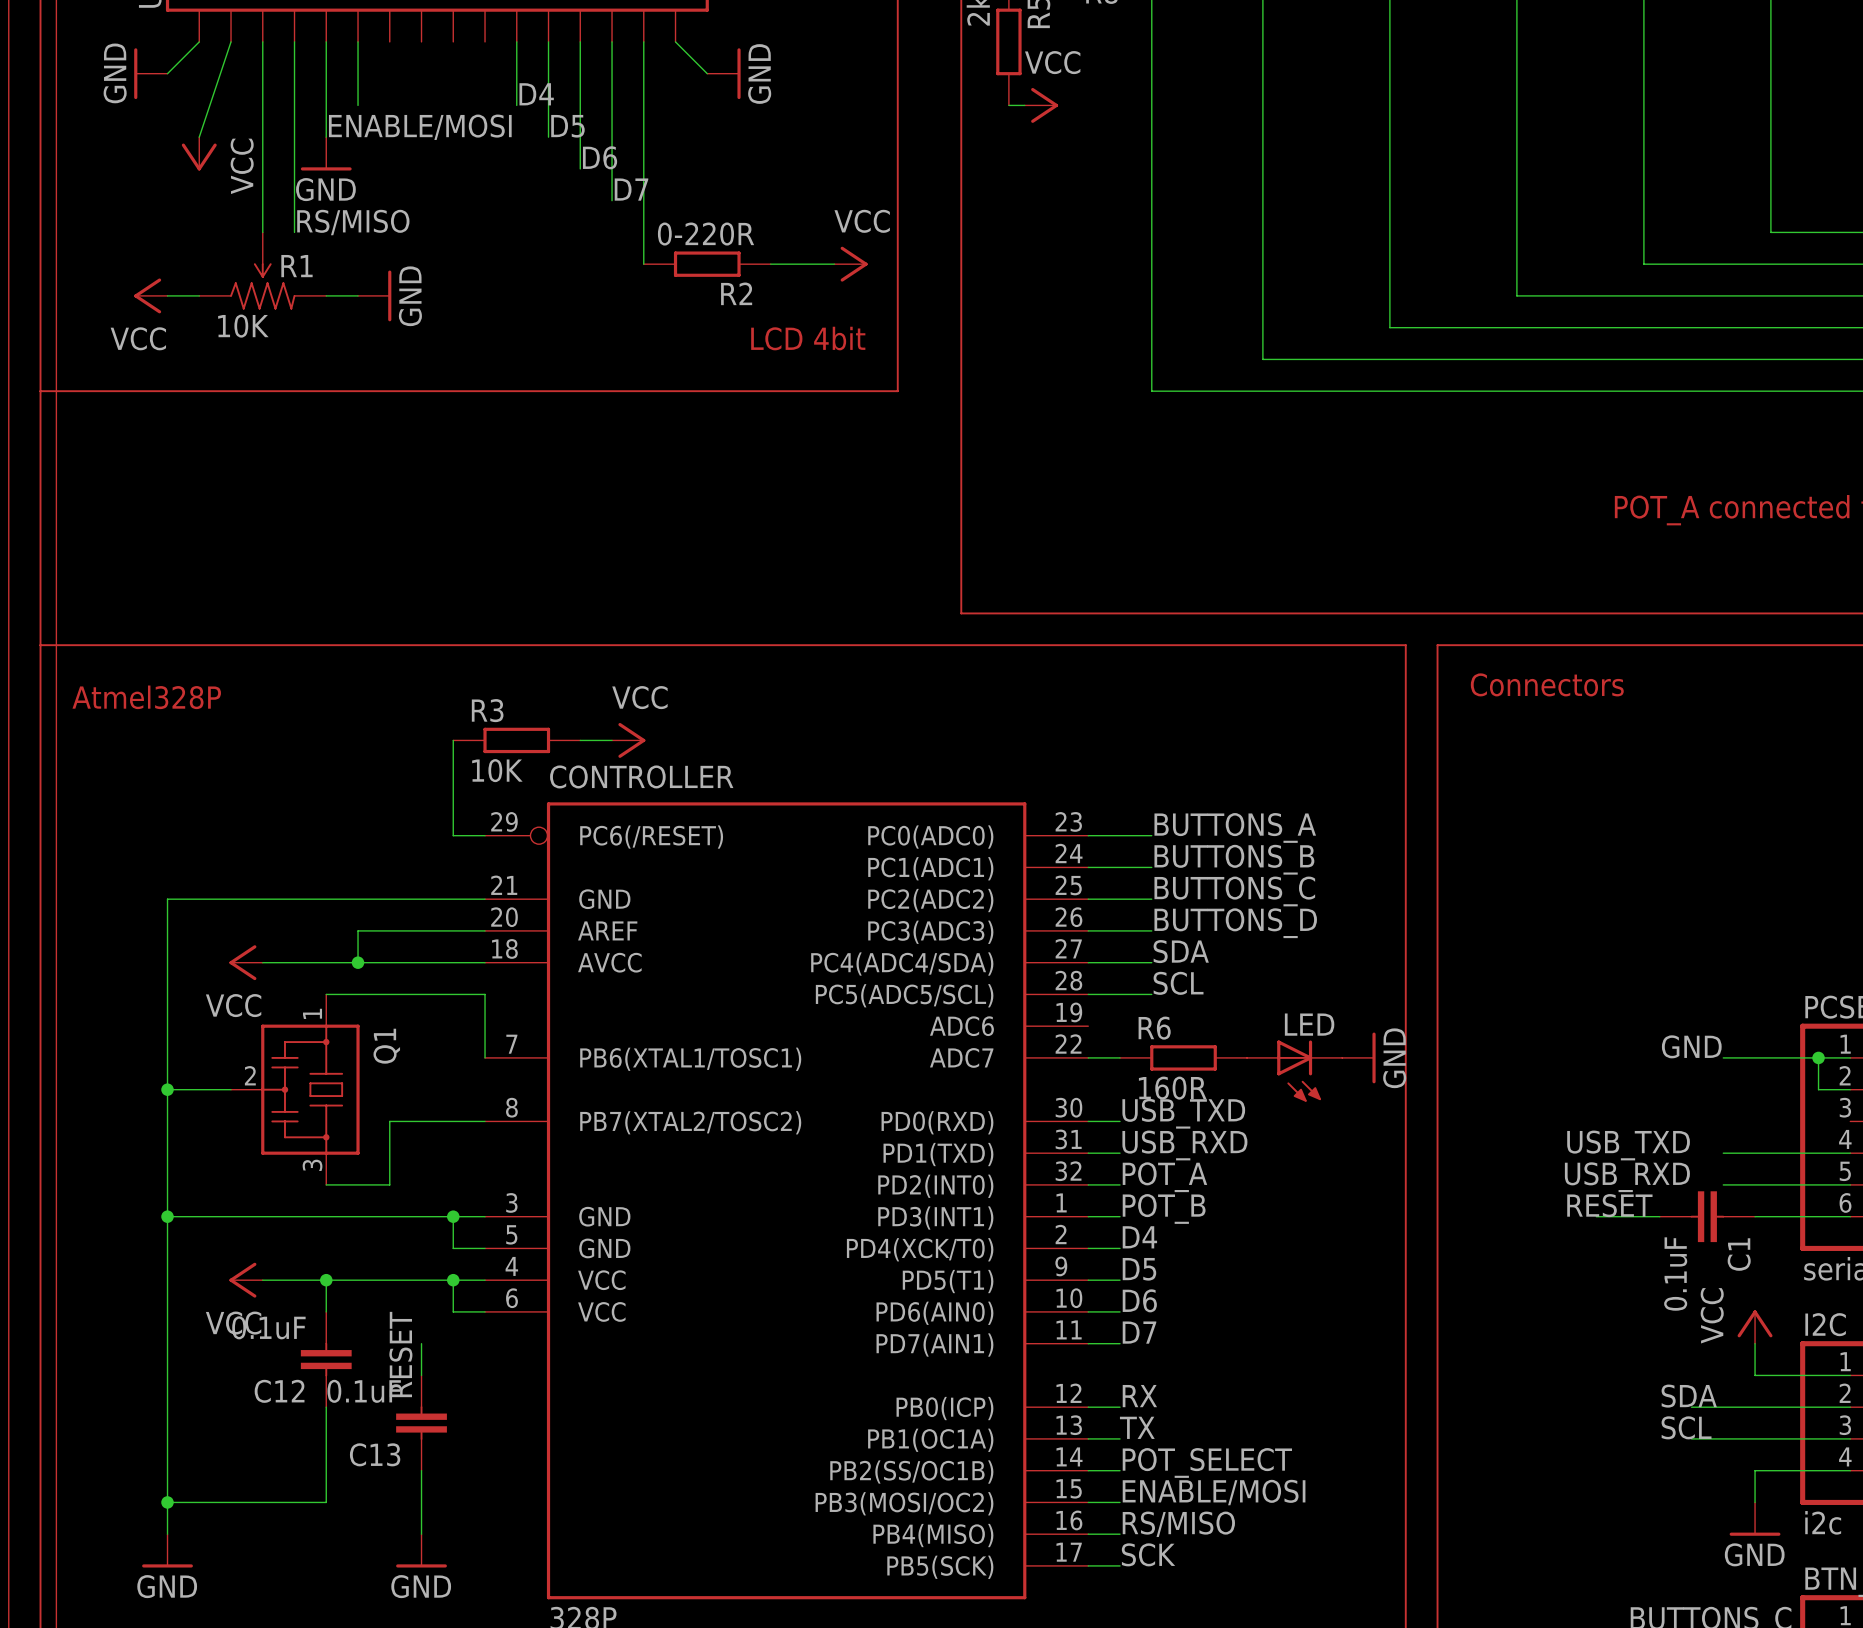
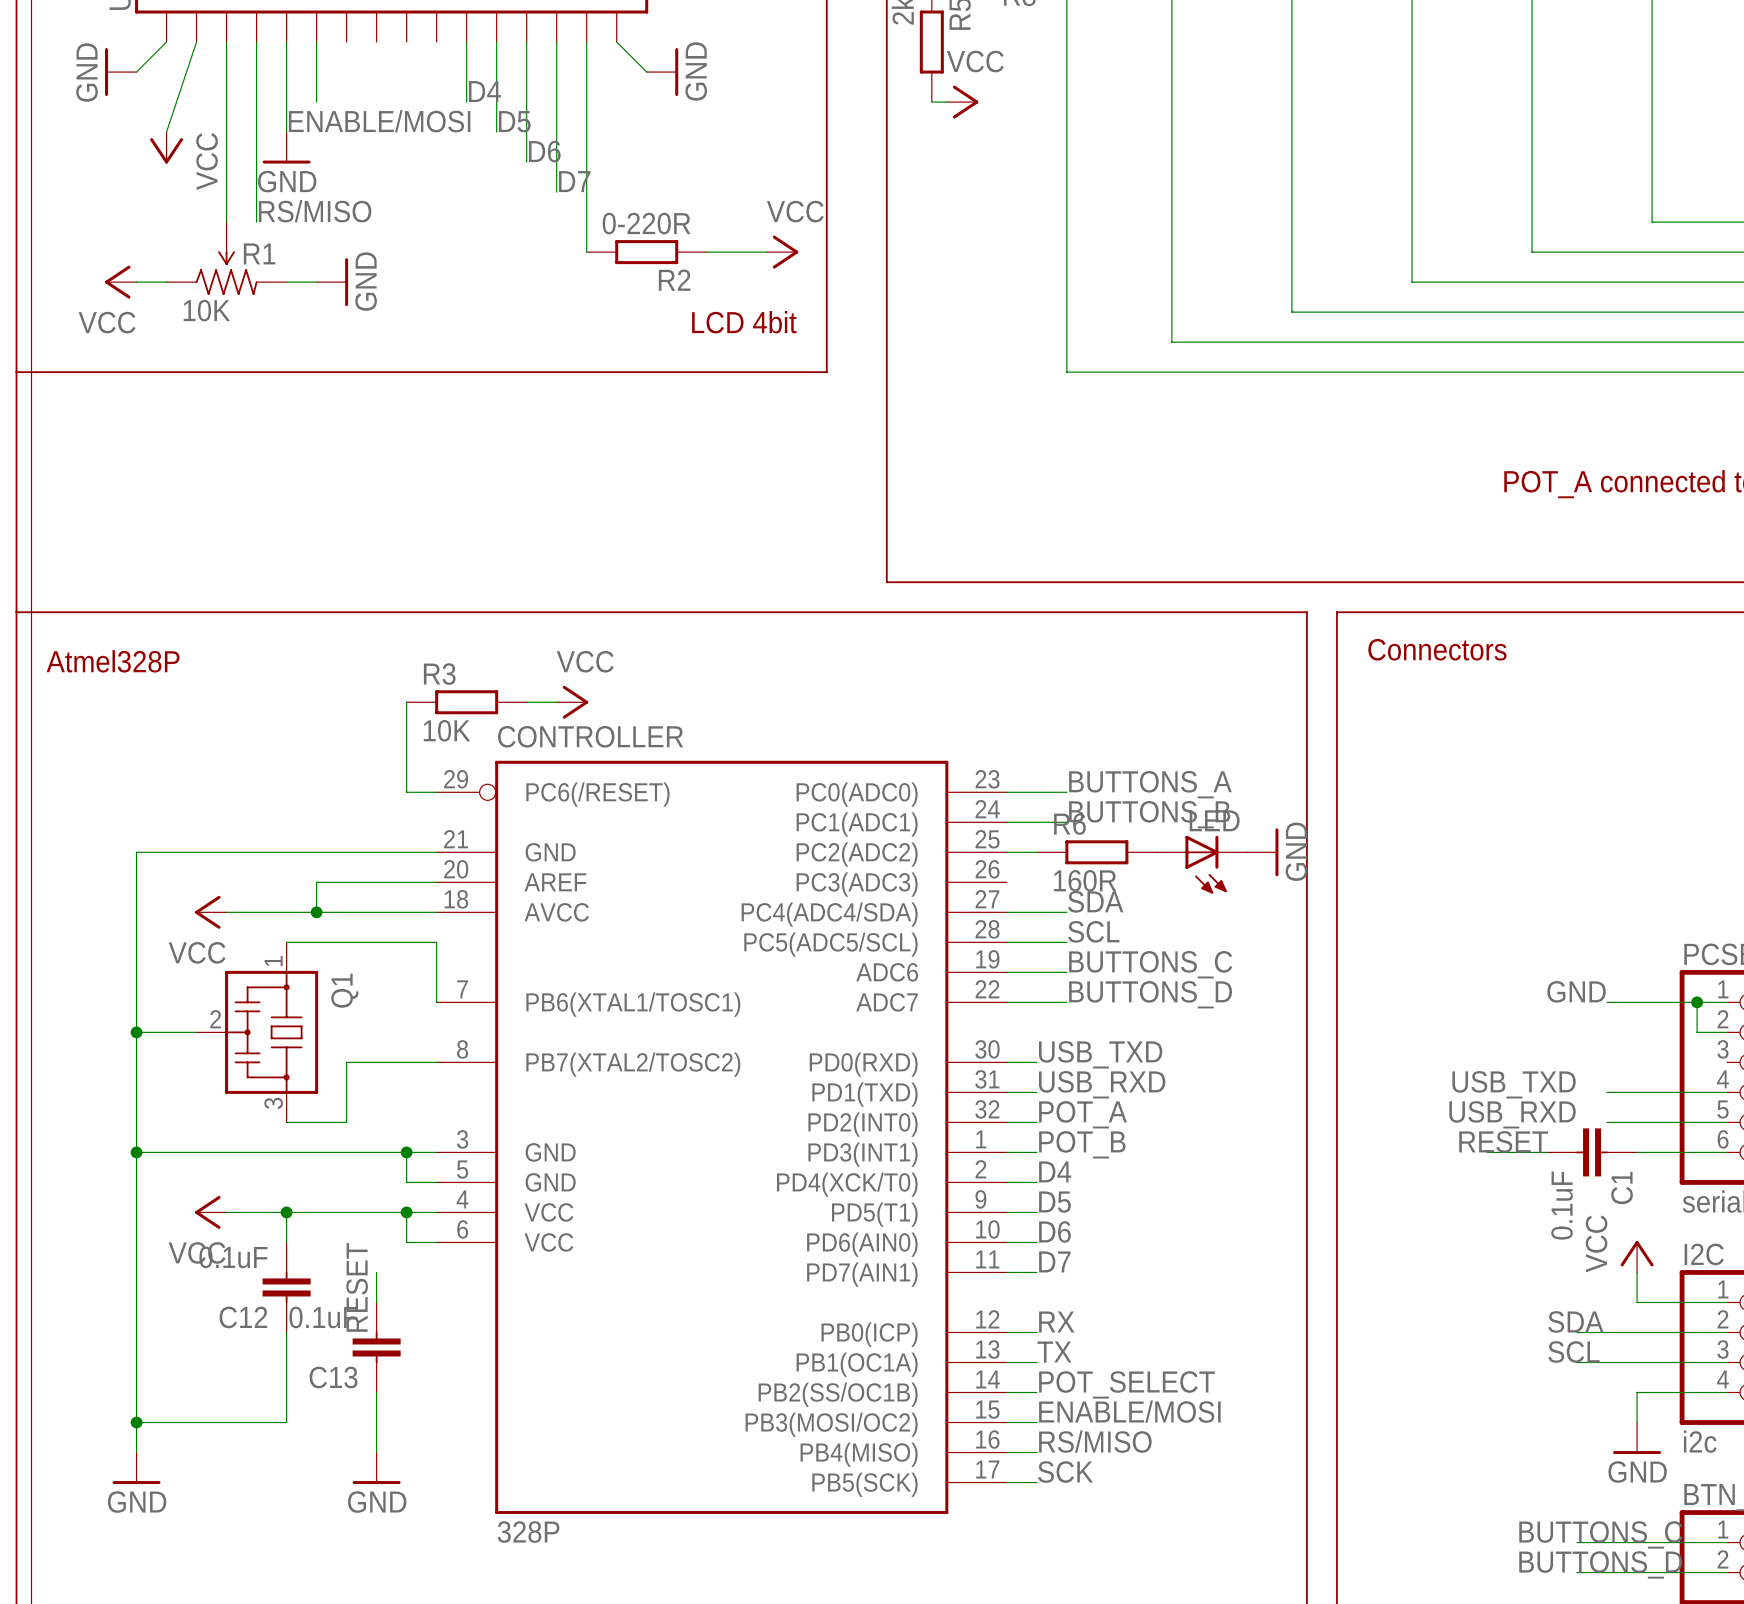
label position: BUTTONS_C (1234, 891) -> BUTTONS_C (1150, 964)
label position: BUTTONS_D (1235, 923) -> BUTTONS_D (1150, 994)
wire: (1088, 930) (1151, 930) -> (1006, 972) (1066, 972)
R6 position: (1183, 1057) -> (1096, 852)
power symbol position: GND (1358, 1057) -> GND (1262, 852)
LED position: (1294, 1071) -> (1201, 864)

